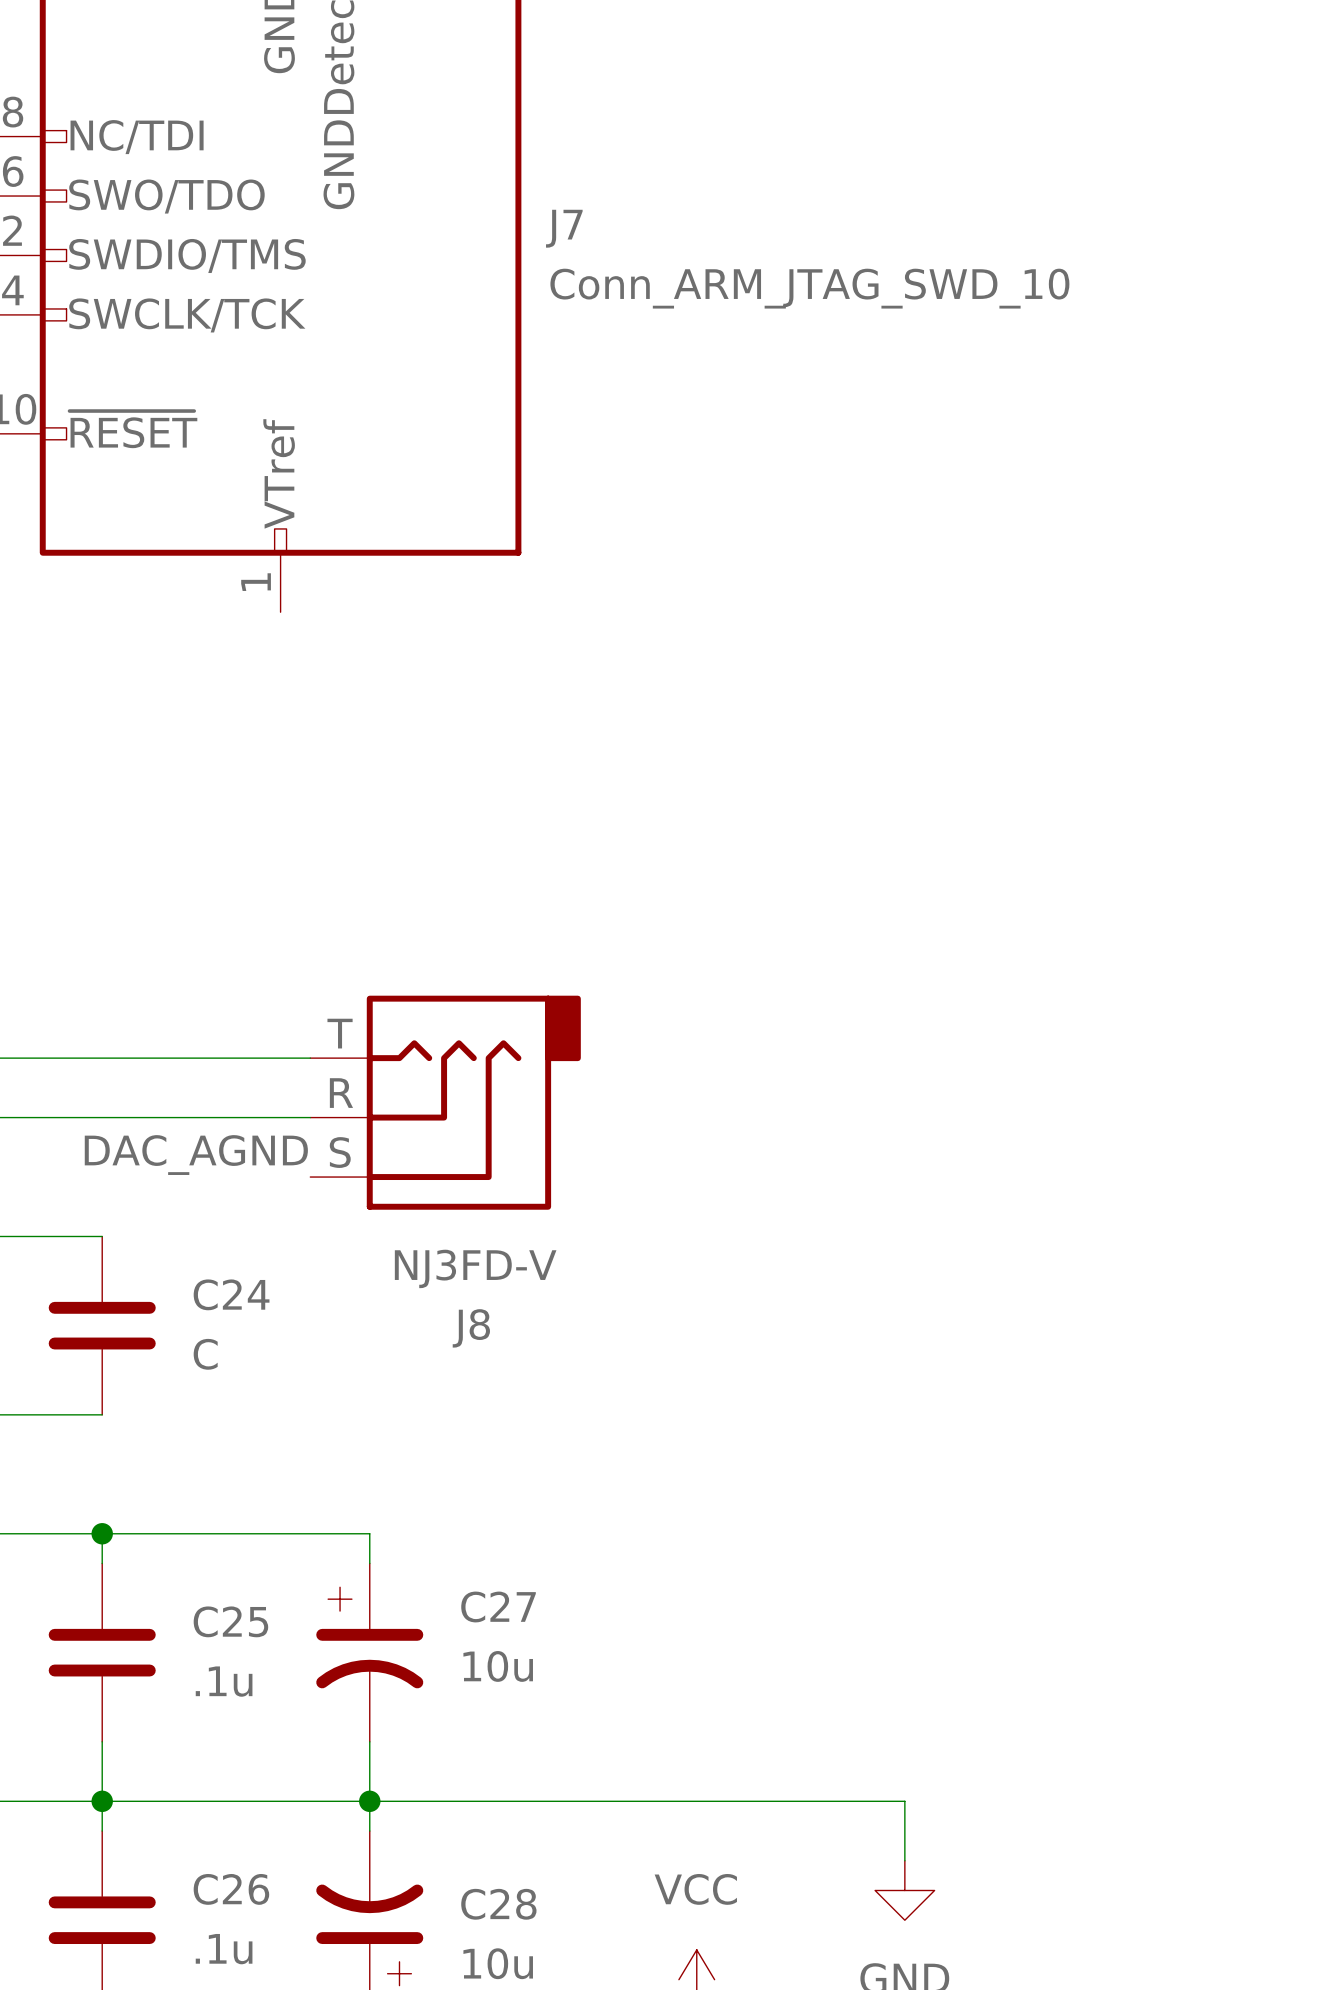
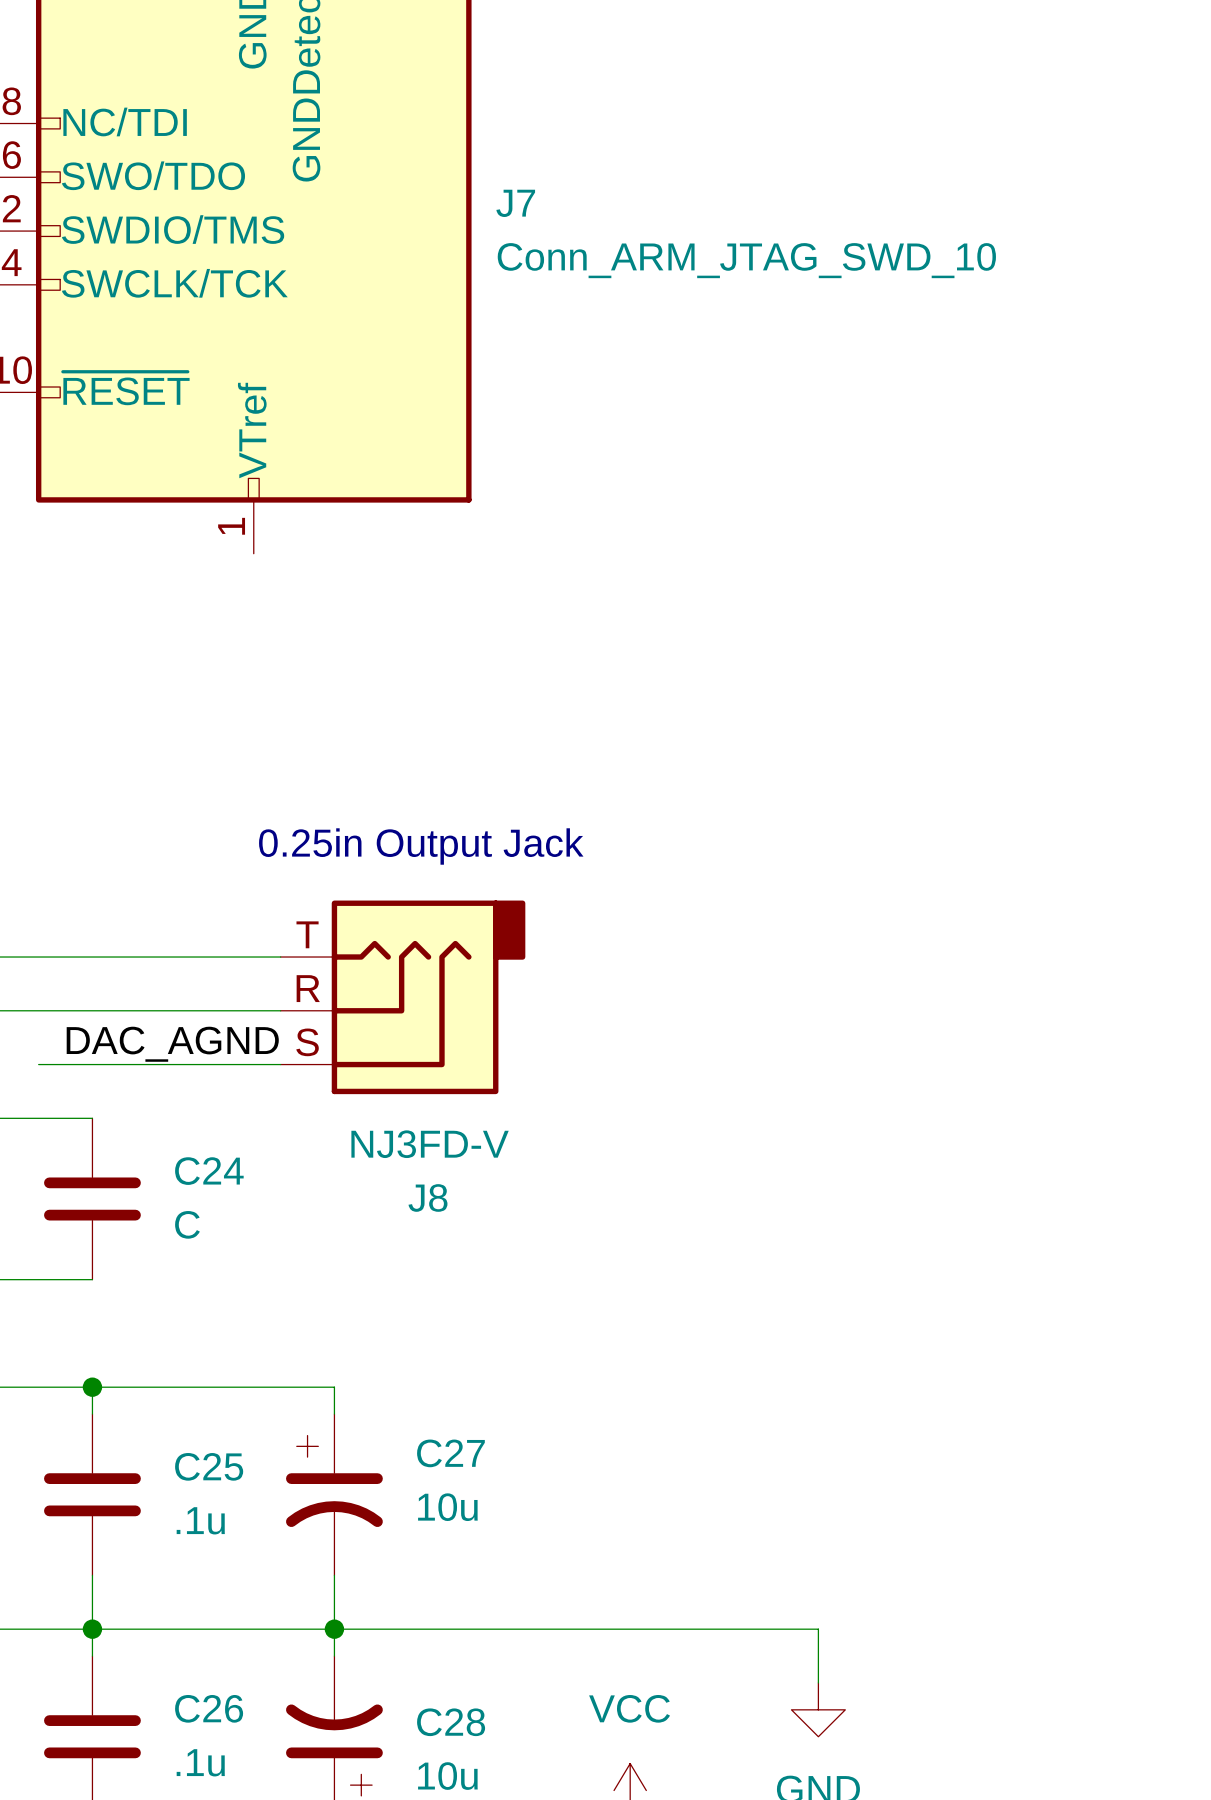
text: none -> 0.25in Output Jack (421, 846)
wire: none -> (38, 1064) (280, 1064)

